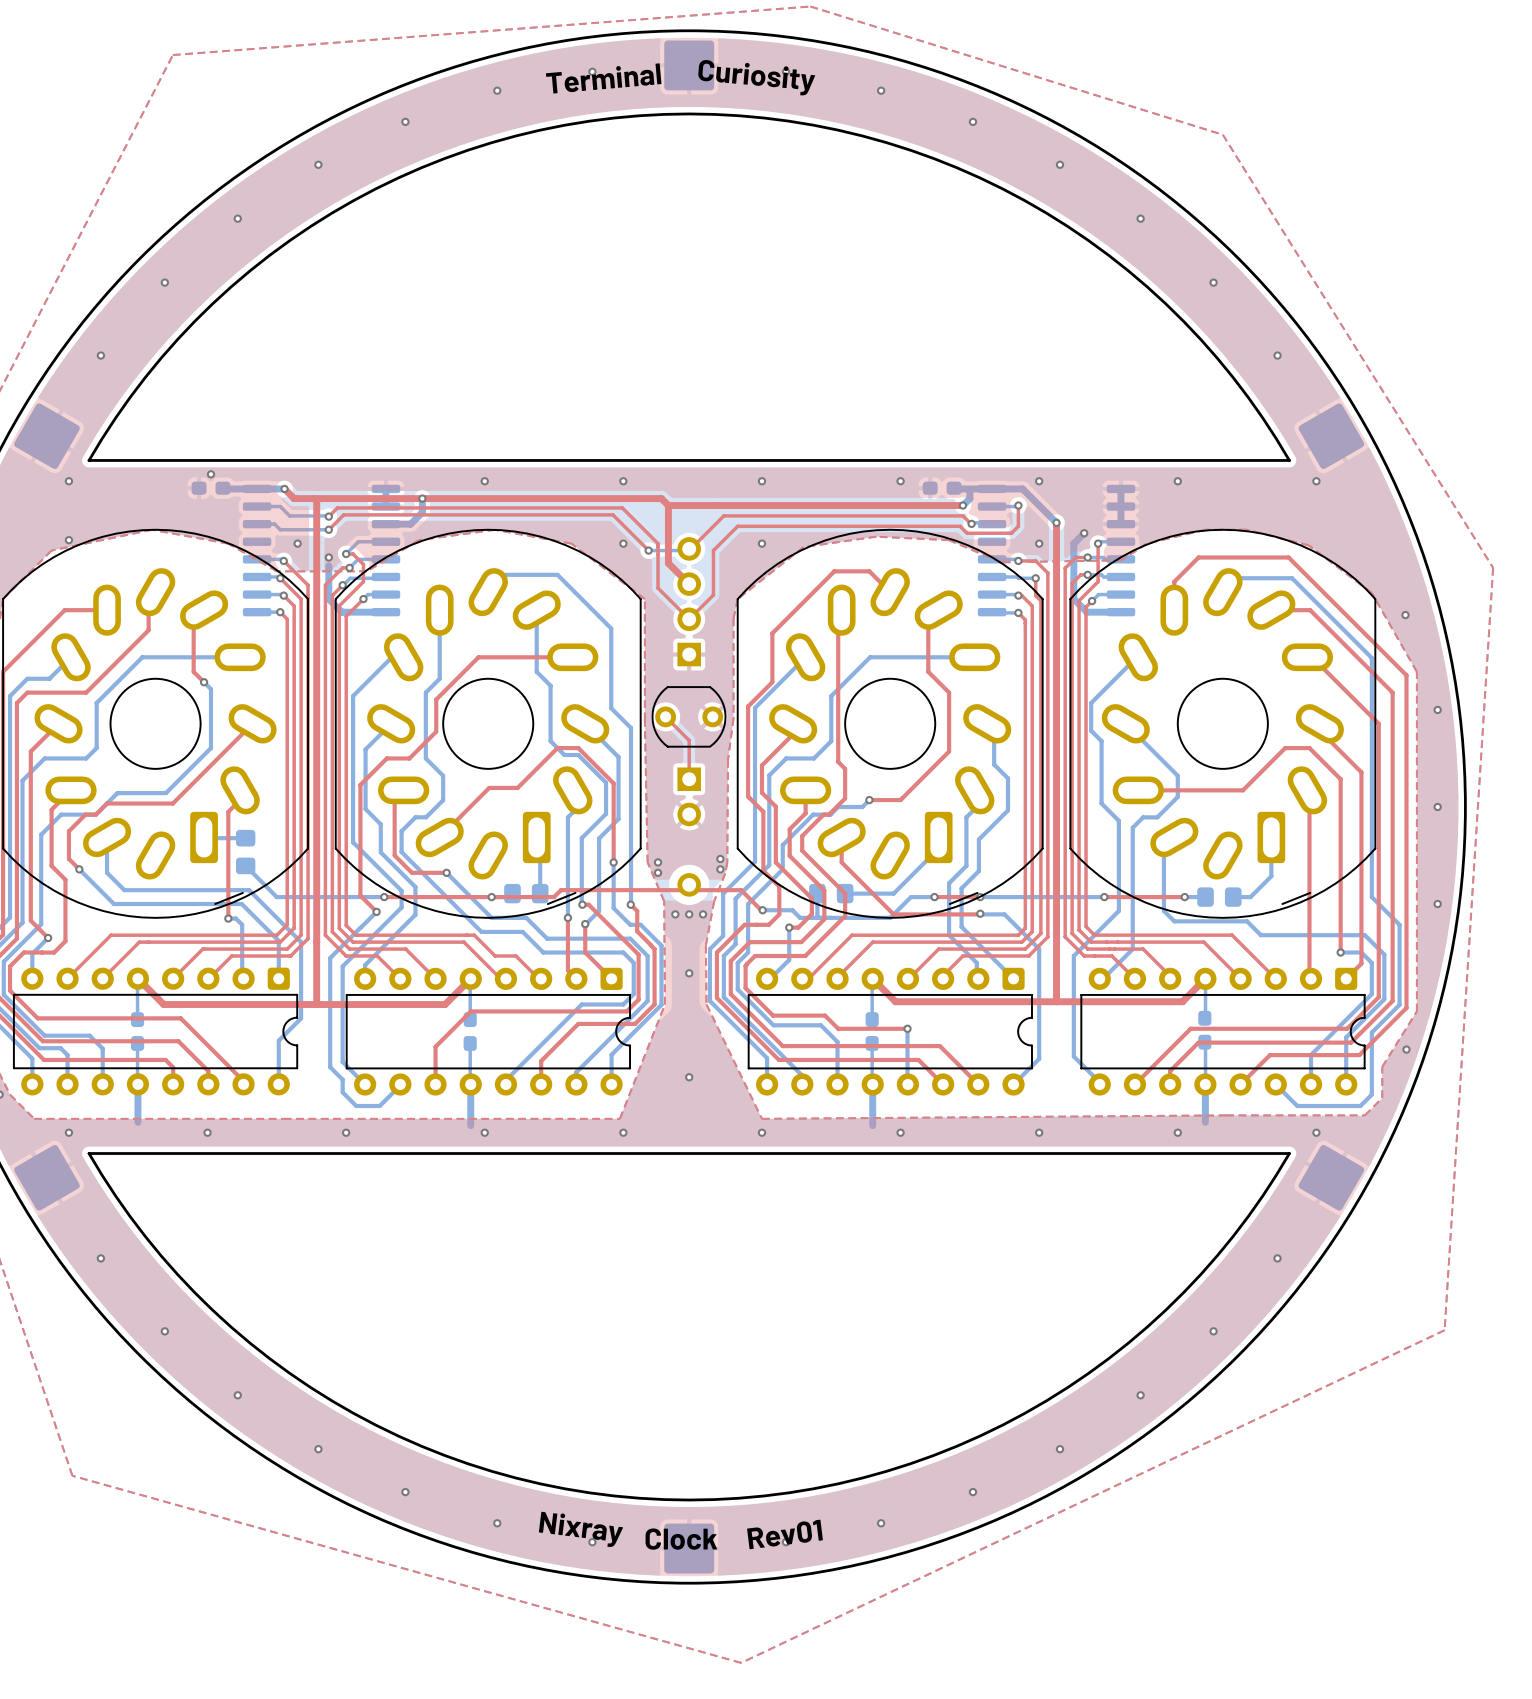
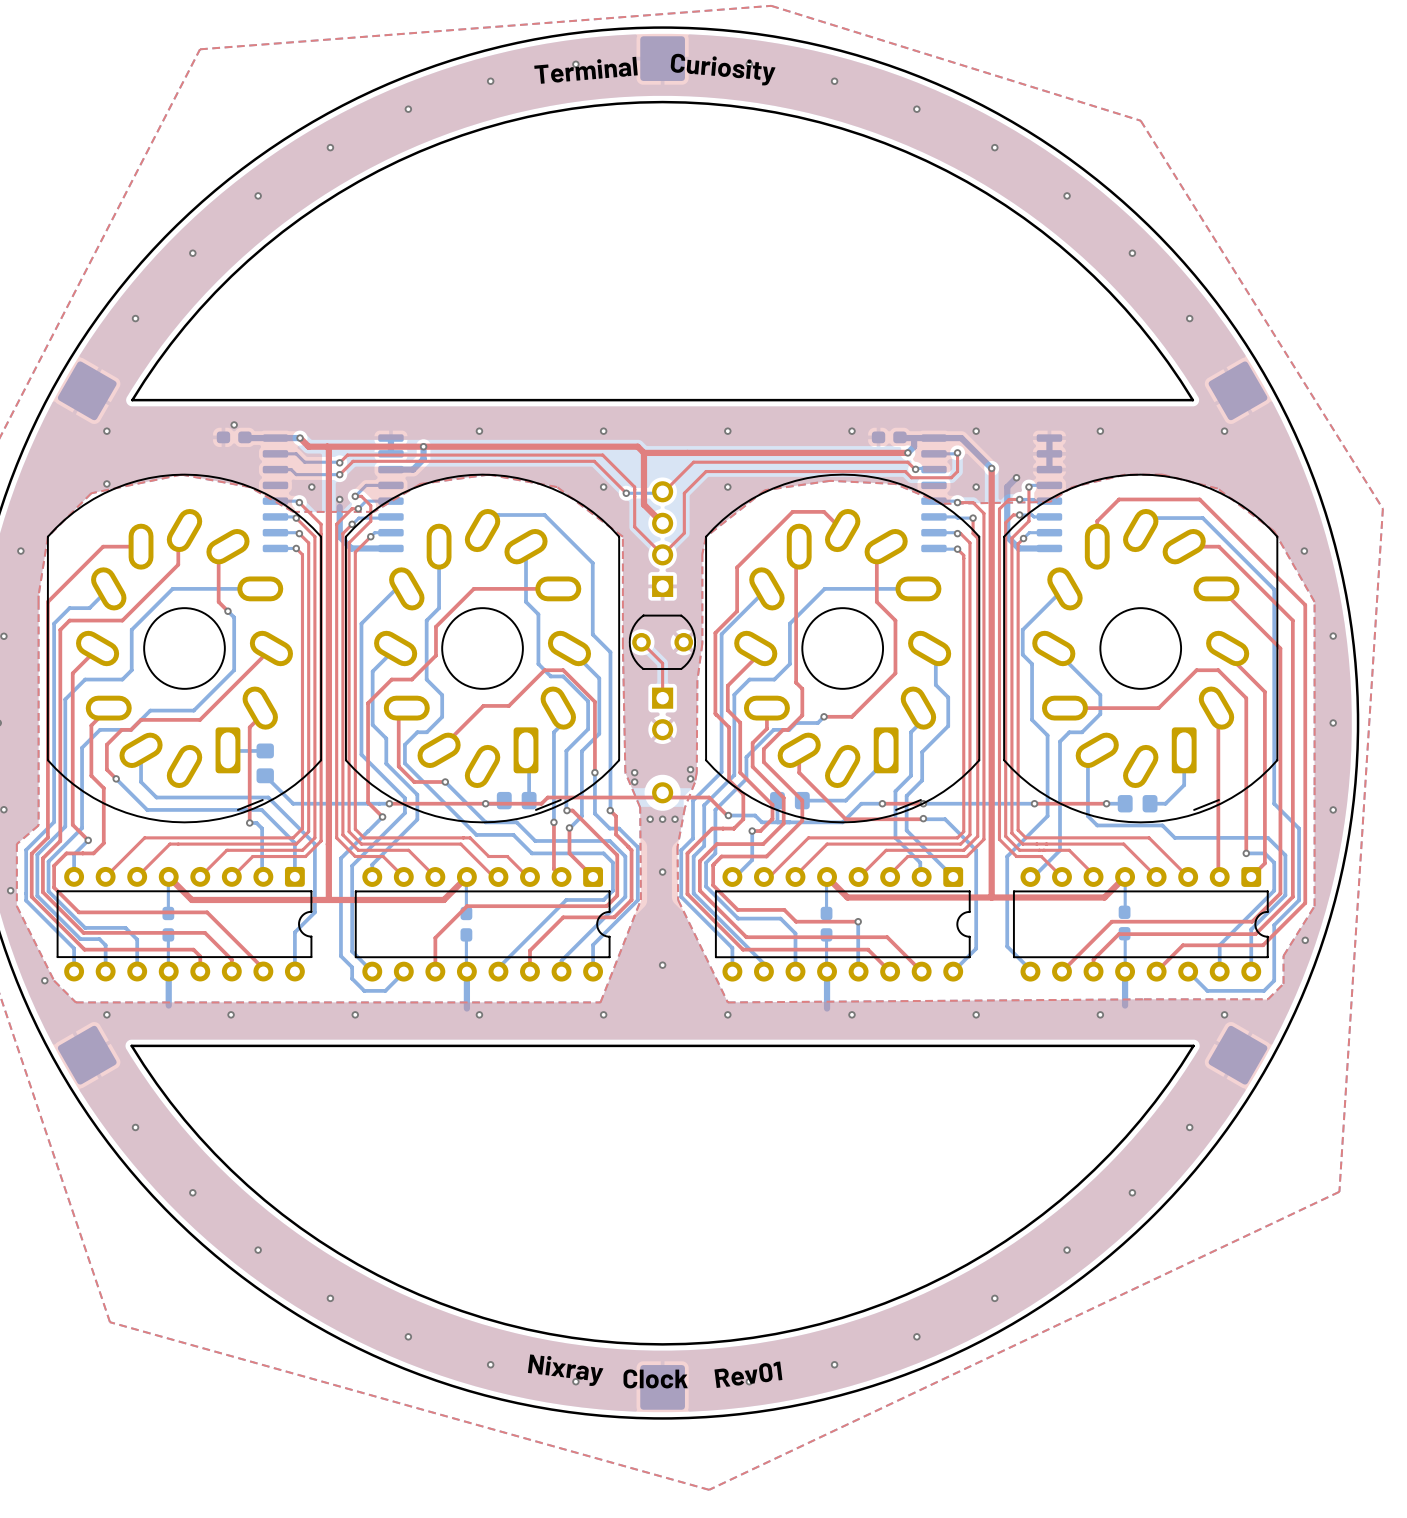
board edge: (89, 460) (1289, 460) (1248, 397) (1217, 358) (1183, 321) (1147, 286) (1108, 255) (1067, 226) (1024, 200) (980, 178) (934, 158) (862, 135) (788, 121) (739, 115) (689, 113) (639, 115) (589, 121) (540, 130) (491, 142) (421, 167) (375, 188) (331, 213) (269, 255) (231, 286) (194, 321) (161, 358) (130, 397) (89, 460) -> (132, 400) (170, 344) (199, 309) (231, 276) (265, 246) (301, 218) (358, 181) (419, 151) (461, 135) (505, 122) (572, 108) (617, 103) (662, 102) (707, 103) (753, 108) (819, 122) (863, 135) (905, 151) (966, 181) (1005, 205) (1042, 231) (1093, 276) (1125, 309) (1154, 344) (1192, 400) (132, 400)
board edge: (89, 1153) (1289, 1153) (1262, 1195) (1233, 1236) (1183, 1292) (1128, 1343) (1088, 1373) (1046, 1400) (1002, 1425) (957, 1446) (886, 1471) (838, 1483) (788, 1492) (739, 1498) (689, 1500) (614, 1495) (564, 1488) (515, 1478) (467, 1463) (421, 1446) (353, 1413) (289, 1373) (250, 1343) (212, 1310) (177, 1274) (145, 1236) (115, 1195) (89, 1153) -> (131, 1045) (170, 1102) (199, 1137) (230, 1169) (264, 1200) (300, 1228) (358, 1264) (398, 1285) (440, 1303) (505, 1324) (549, 1334) (594, 1340) (662, 1344) (730, 1340) (775, 1334) (820, 1324) (863, 1311) (905, 1294) (967, 1264) (1024, 1228) (1060, 1200) (1094, 1169) (1140, 1119) (1168, 1083) (1193, 1045) (131, 1045)

